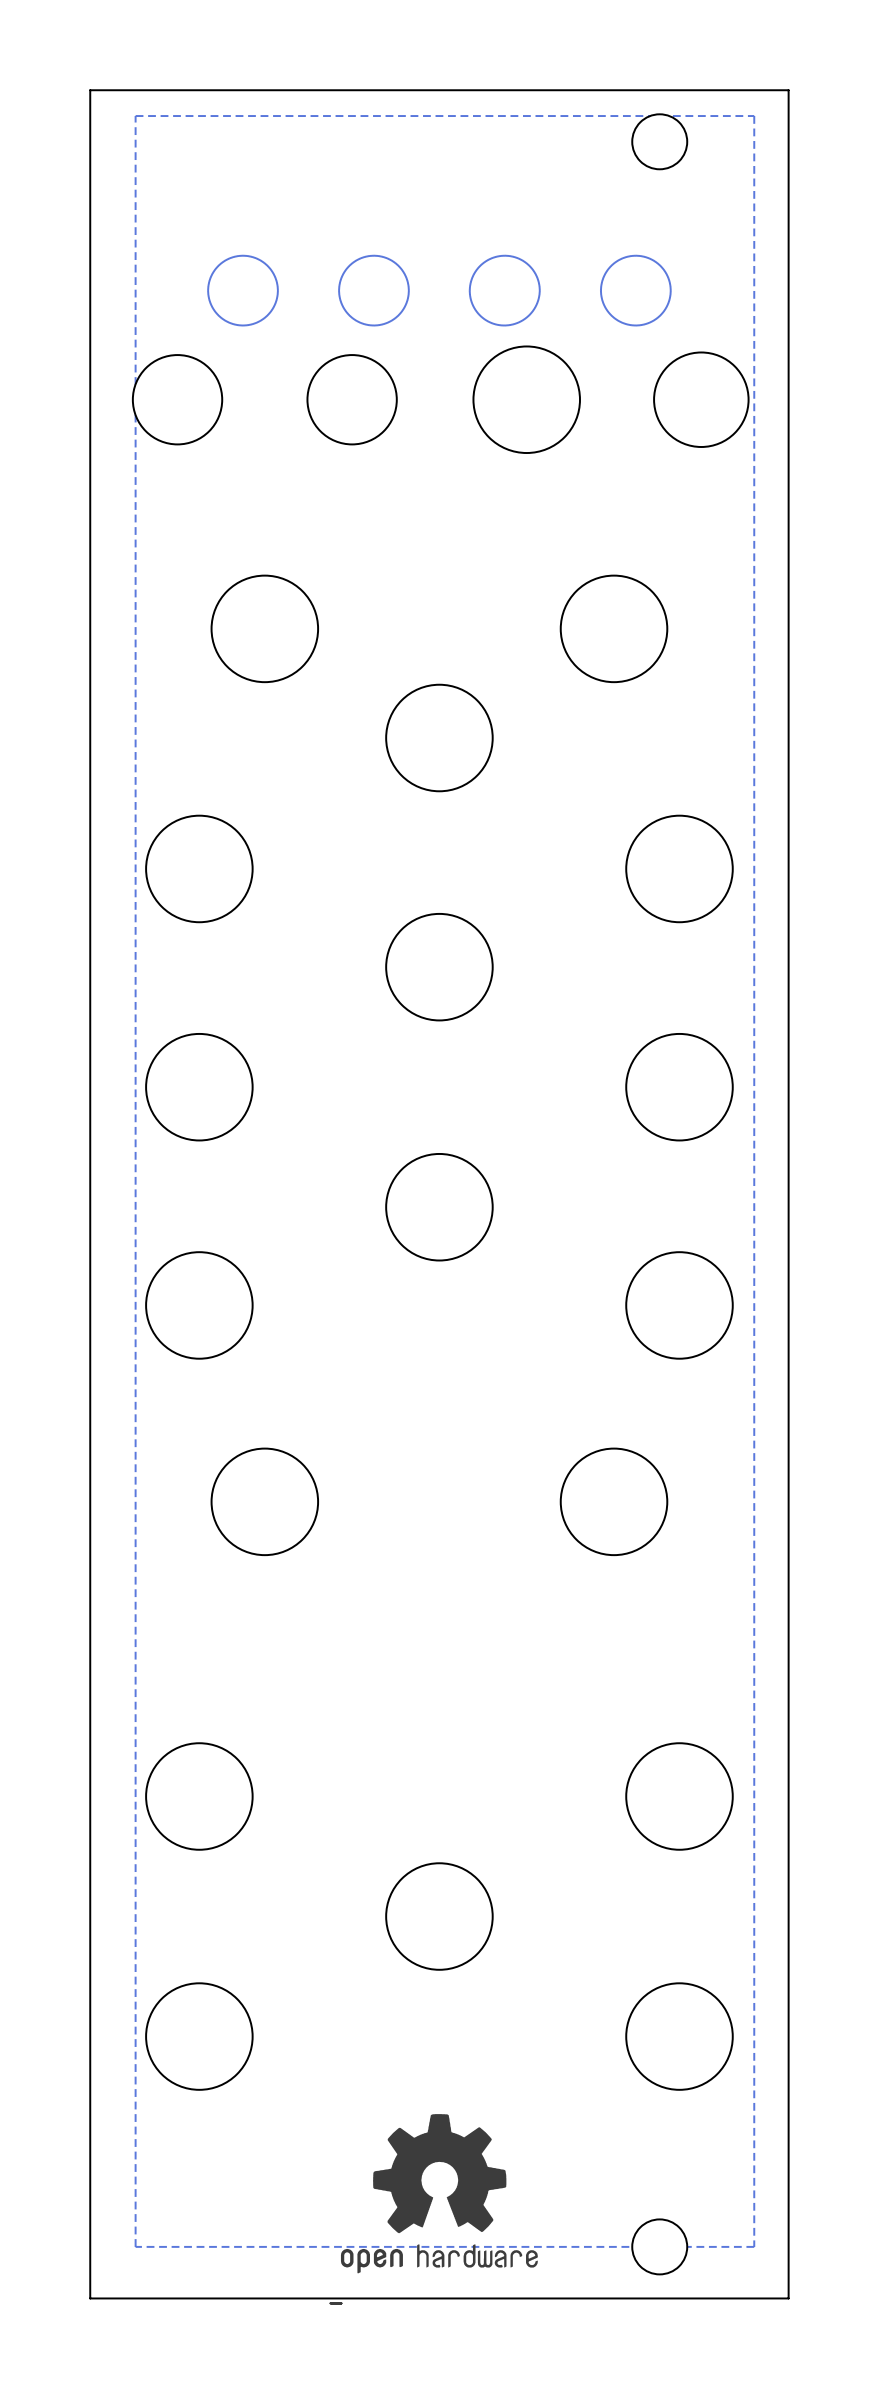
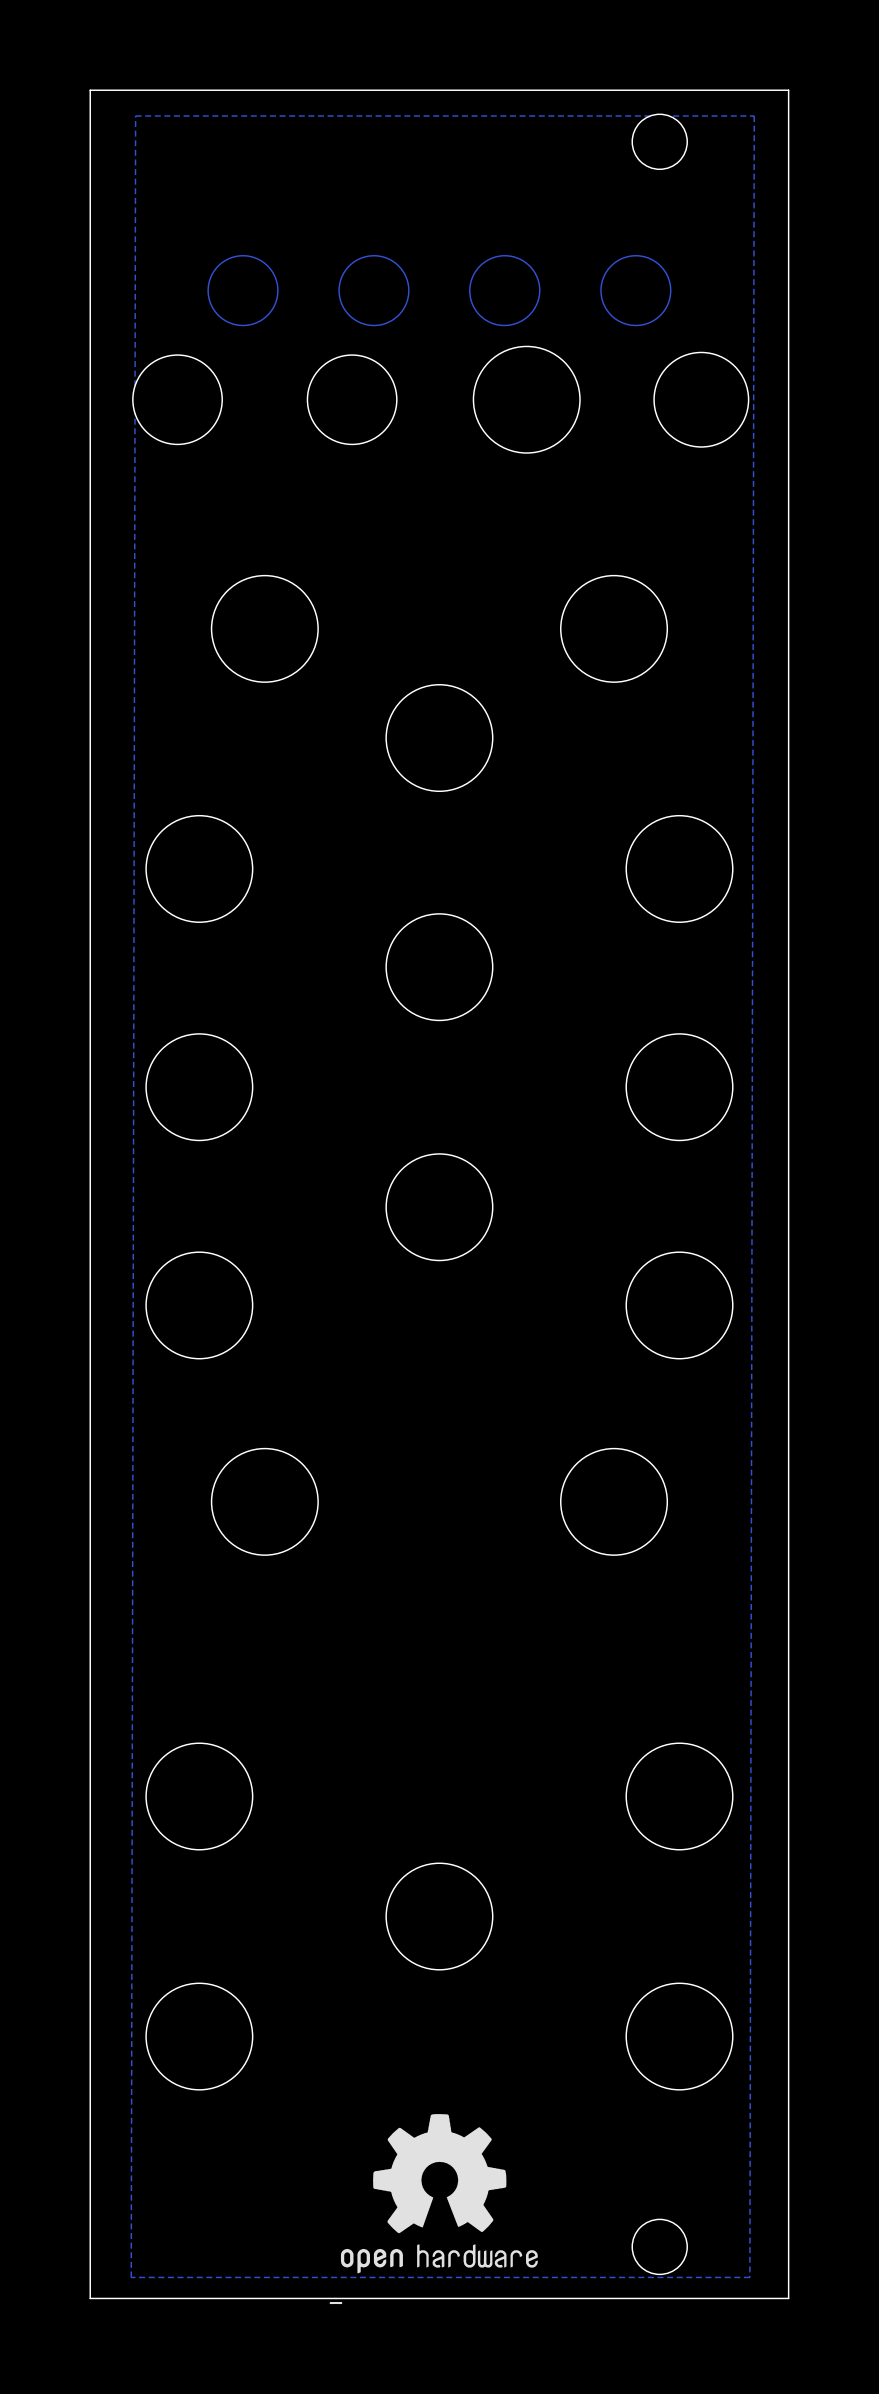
zone outline: (754, 116) (754, 2246) (135, 2246) (135, 116) -> (754, 116) (749, 2277) (131, 2277) (135, 116)

